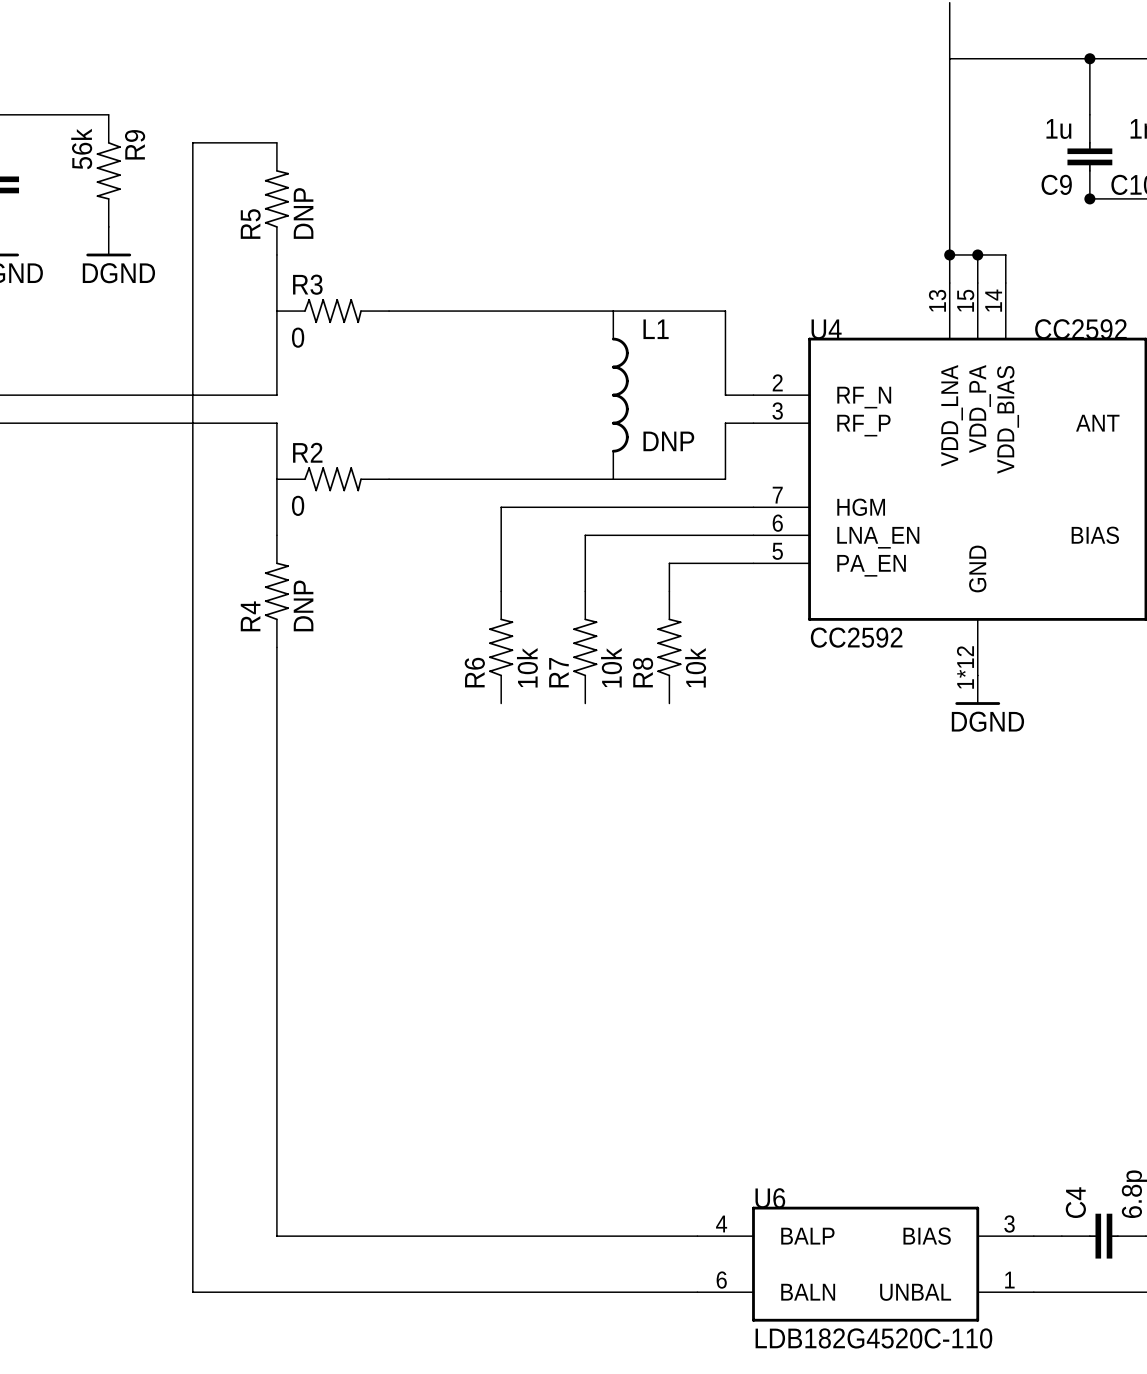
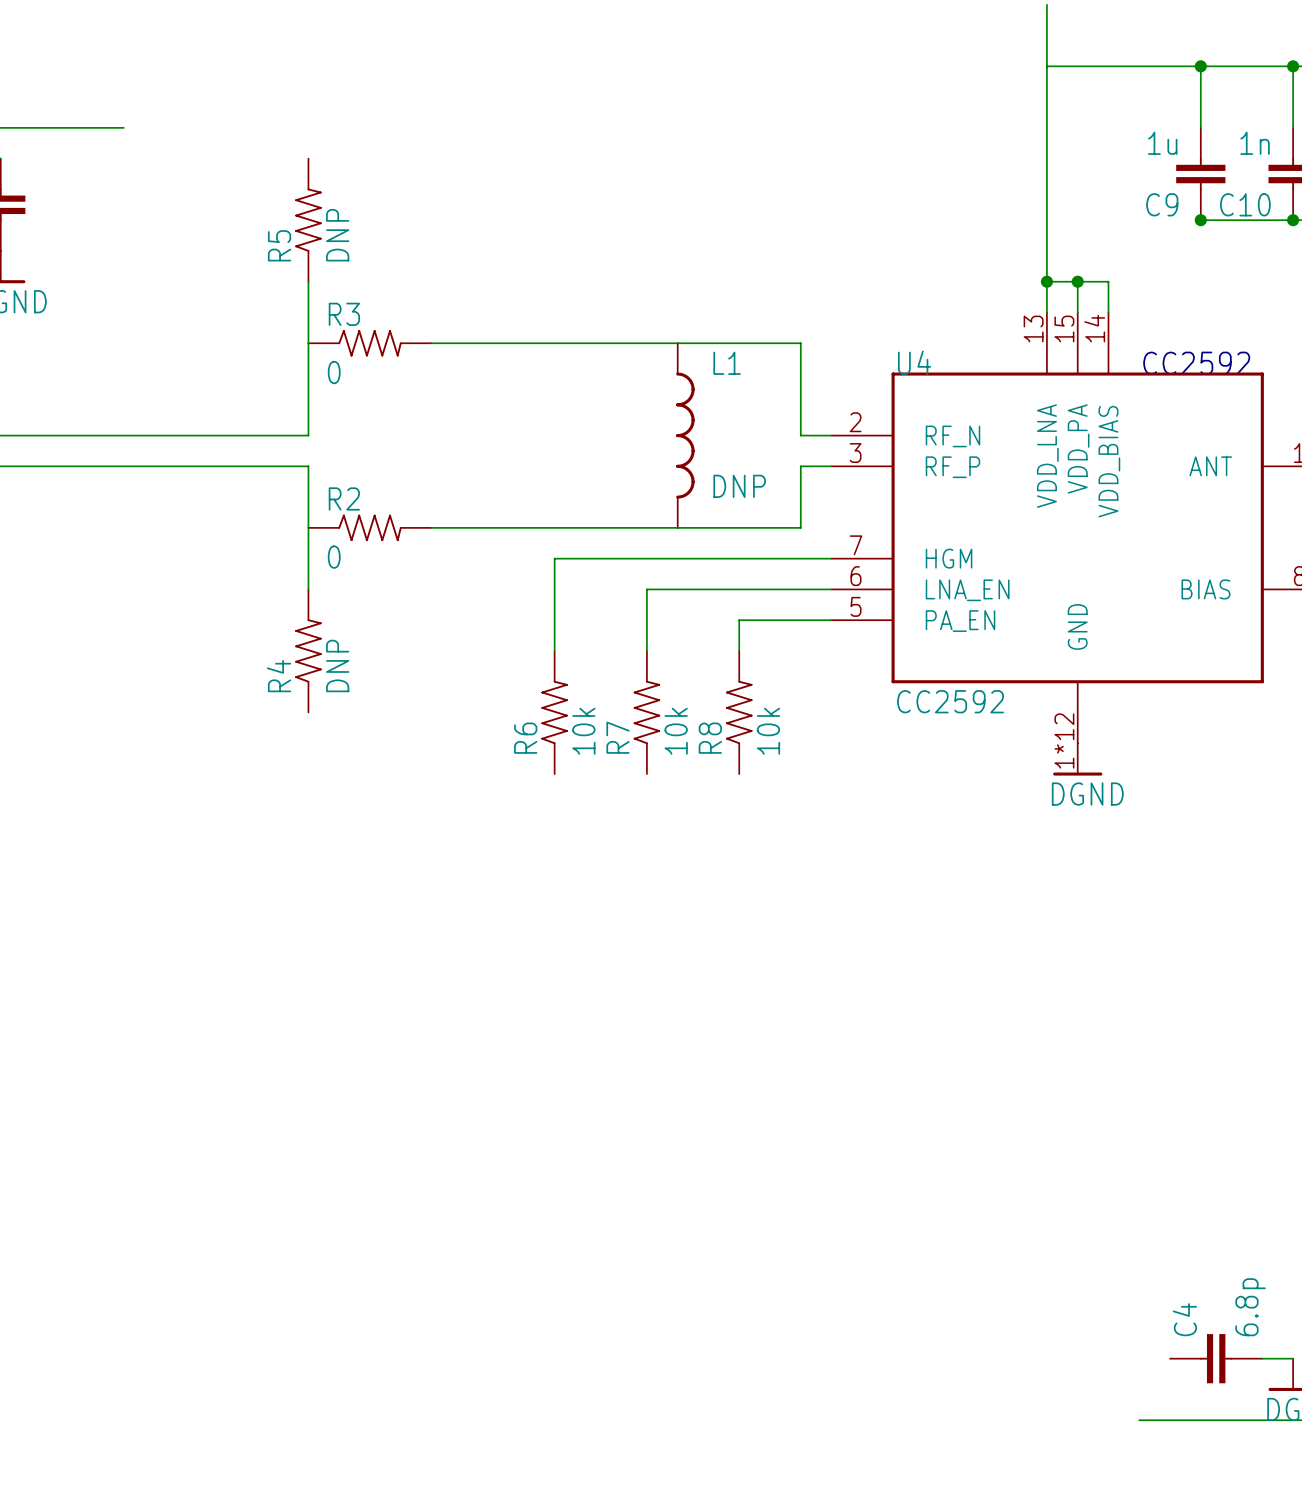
wire: (276, 142) (192, 142) (192, 1292) (697, 1292) -> none
R9: 56k (108, 170) -> none
power symbol: DGND (108, 241) -> none
wire: (276, 647) (276, 1236) (697, 1236) -> none
wire: (1033, 1236) (1061, 1236) -> none
U6: LDB182G4520C-110 (865, 1264) -> none

